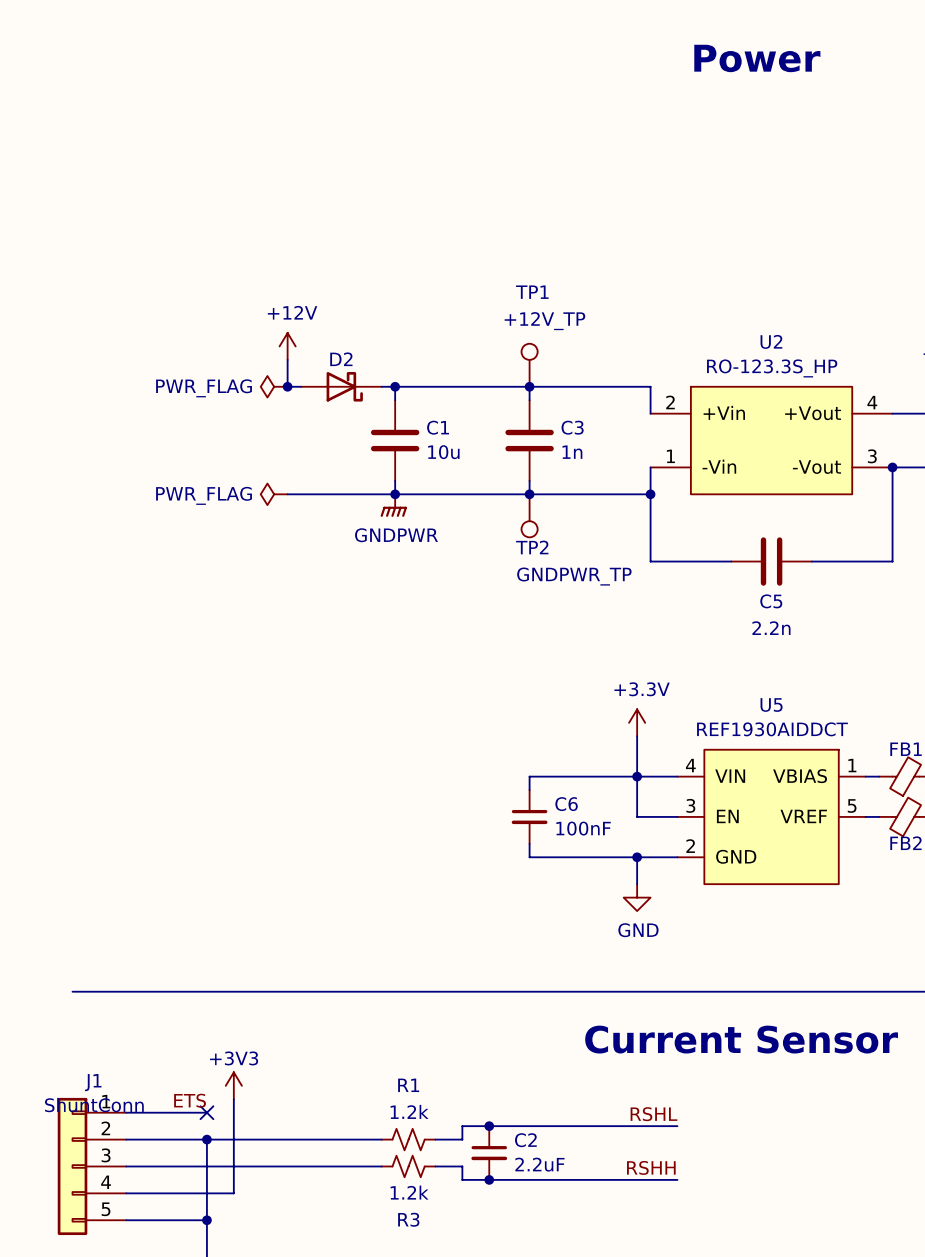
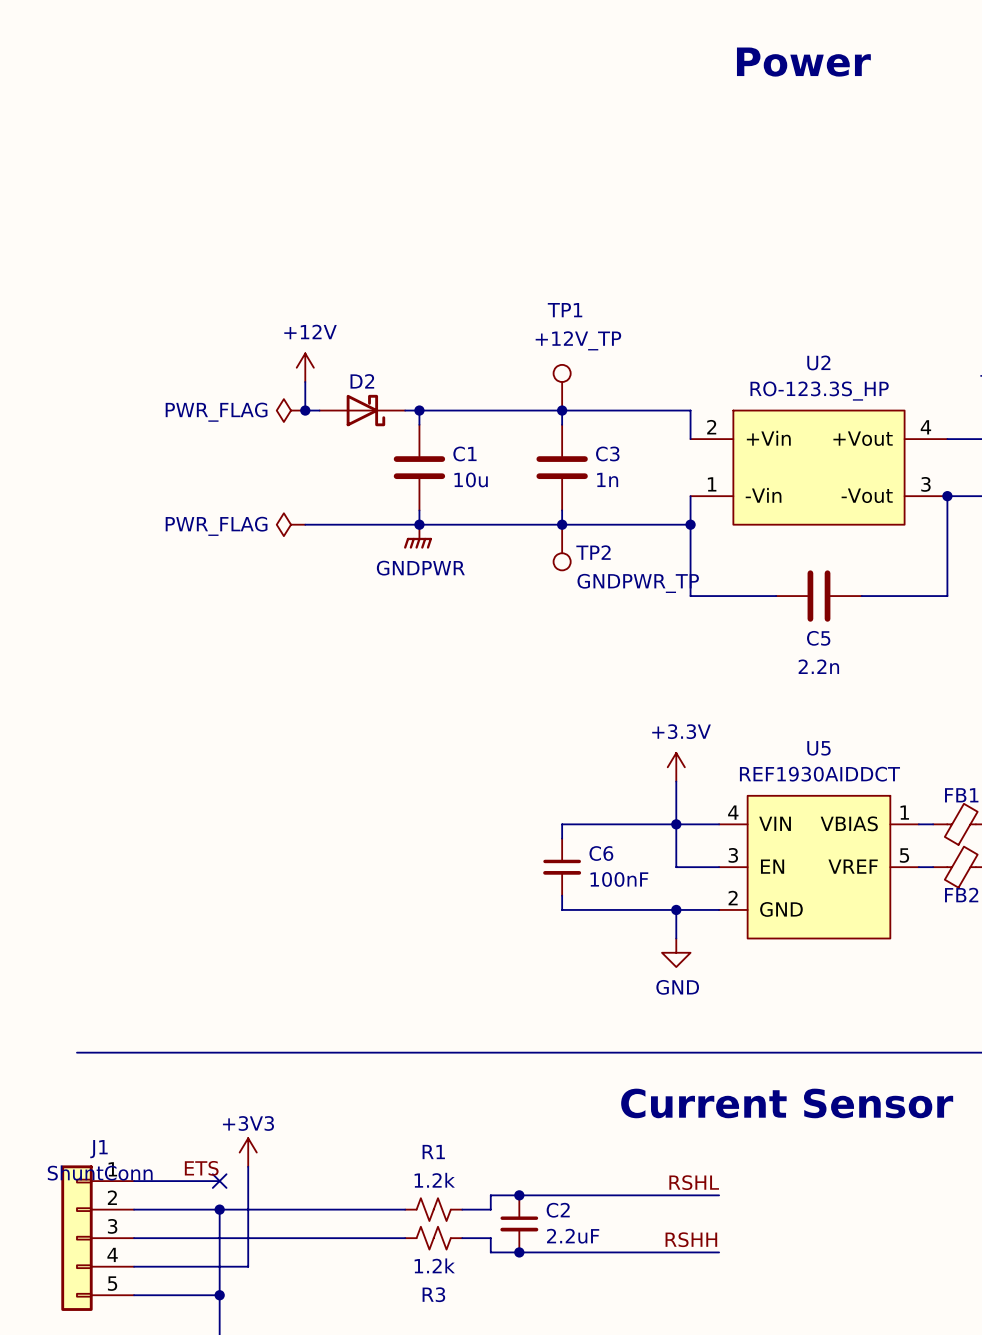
TP2 name position: TP2 (532, 547) -> TP2 (593, 552)
TP2 value position: GNDPWR_TP (574, 576) -> GNDPWR_TP (638, 583)

